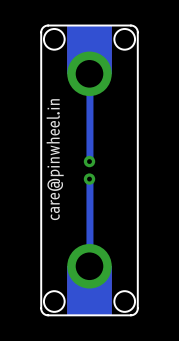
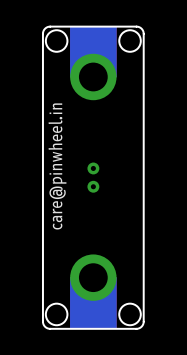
bottom track: (89, 73) (89, 161) -> none
bottom track: (89, 179) (89, 266) -> none

